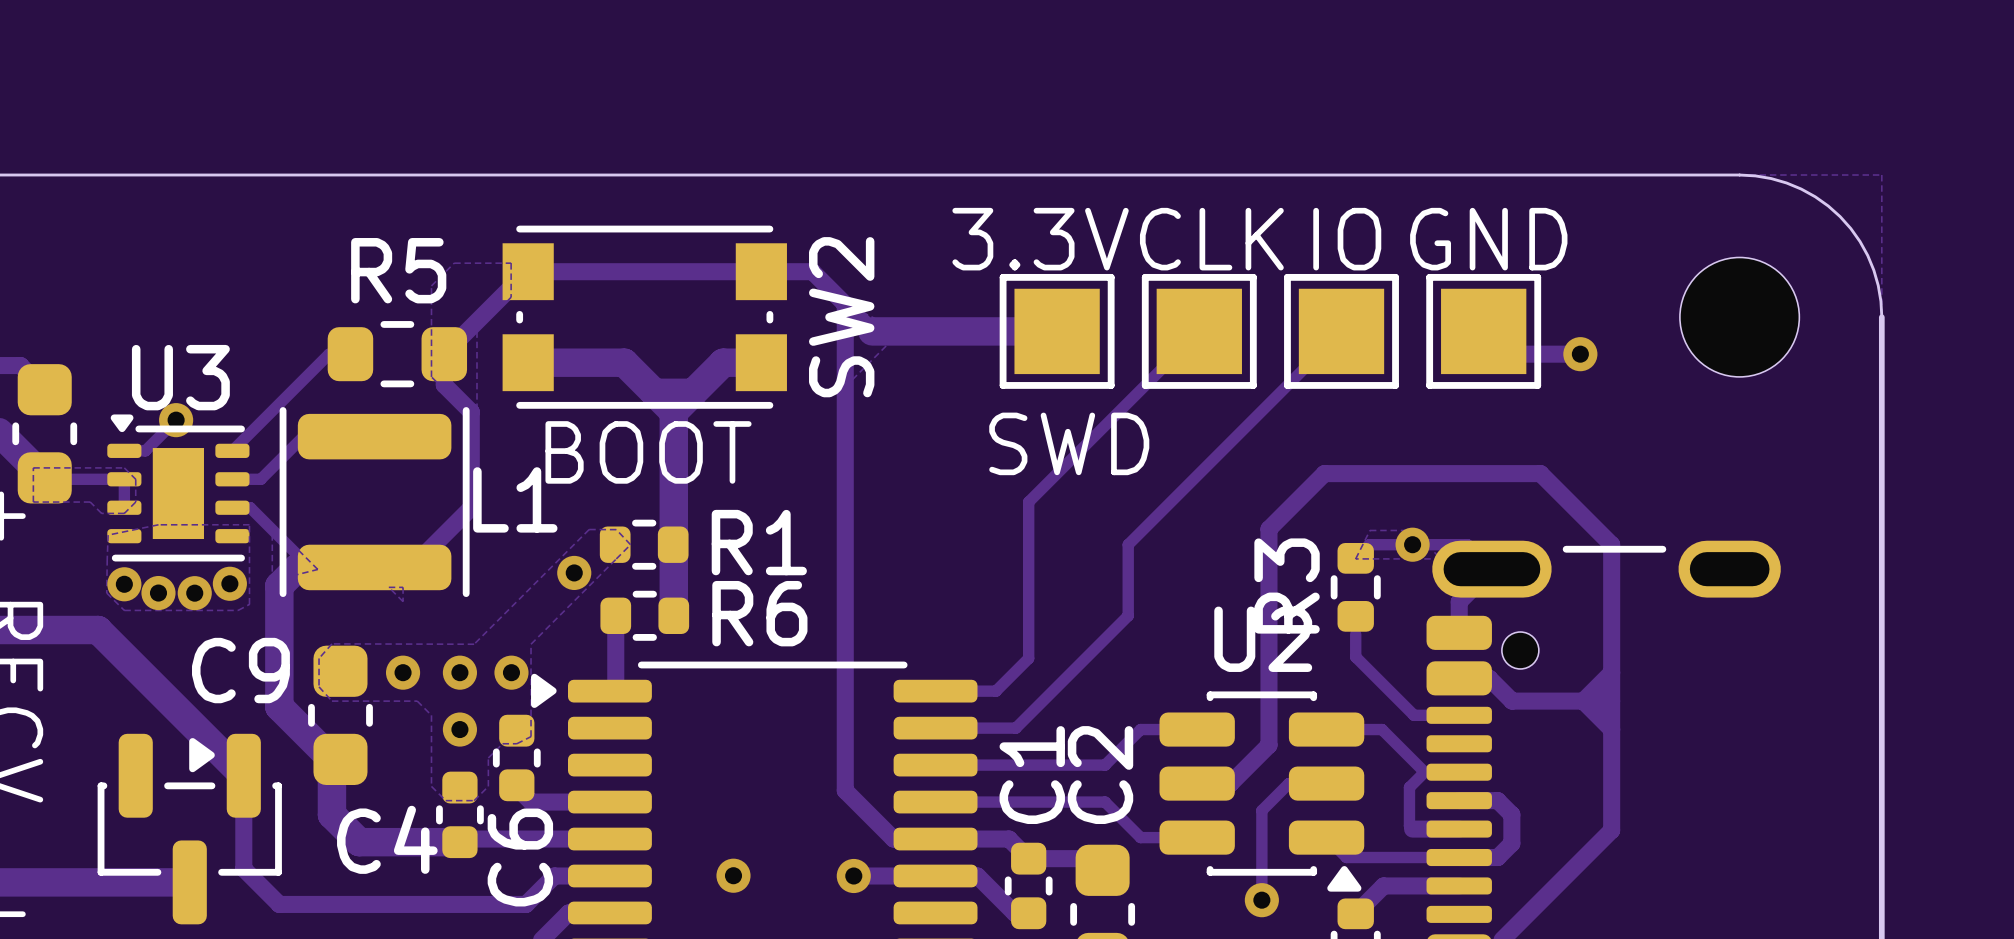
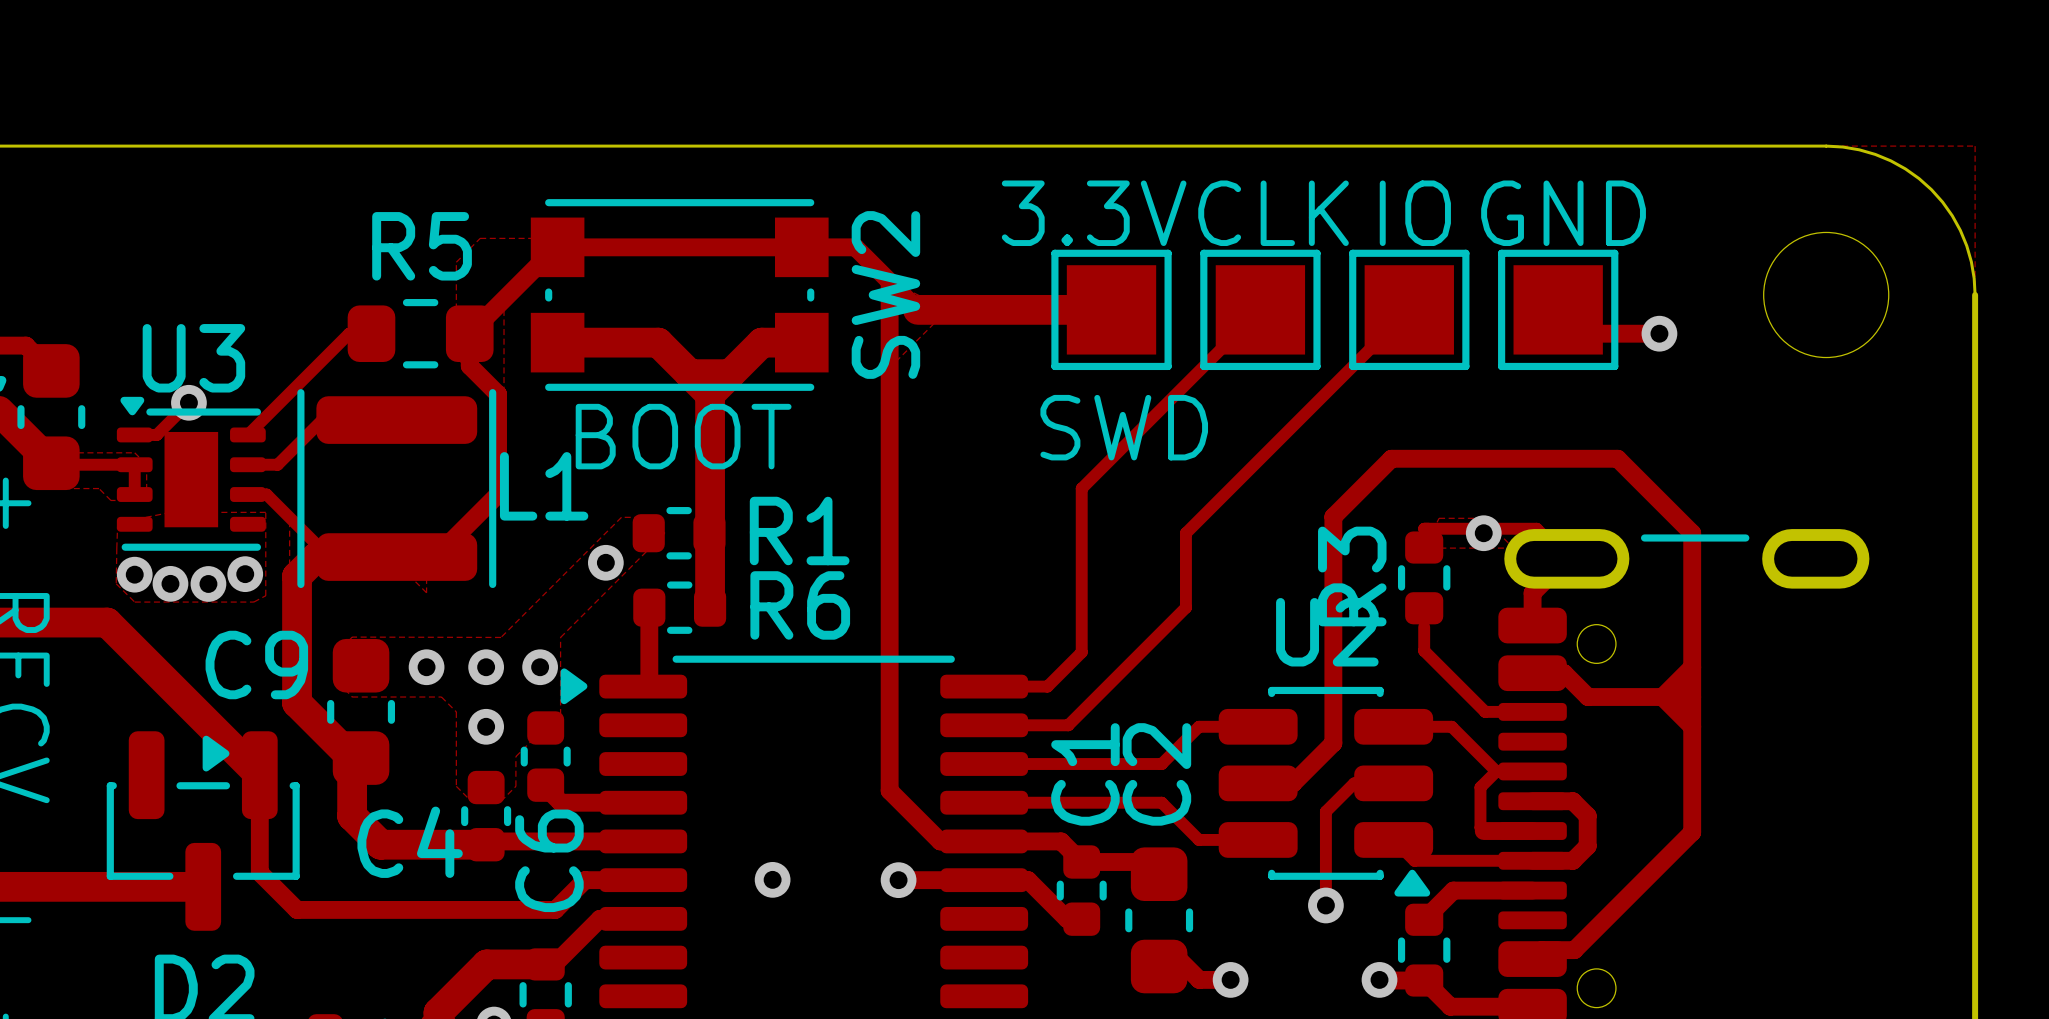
track: (1467, 544) (1369, 544) (1355, 558) -> (1541, 533) (1536, 528) (1424, 528)

